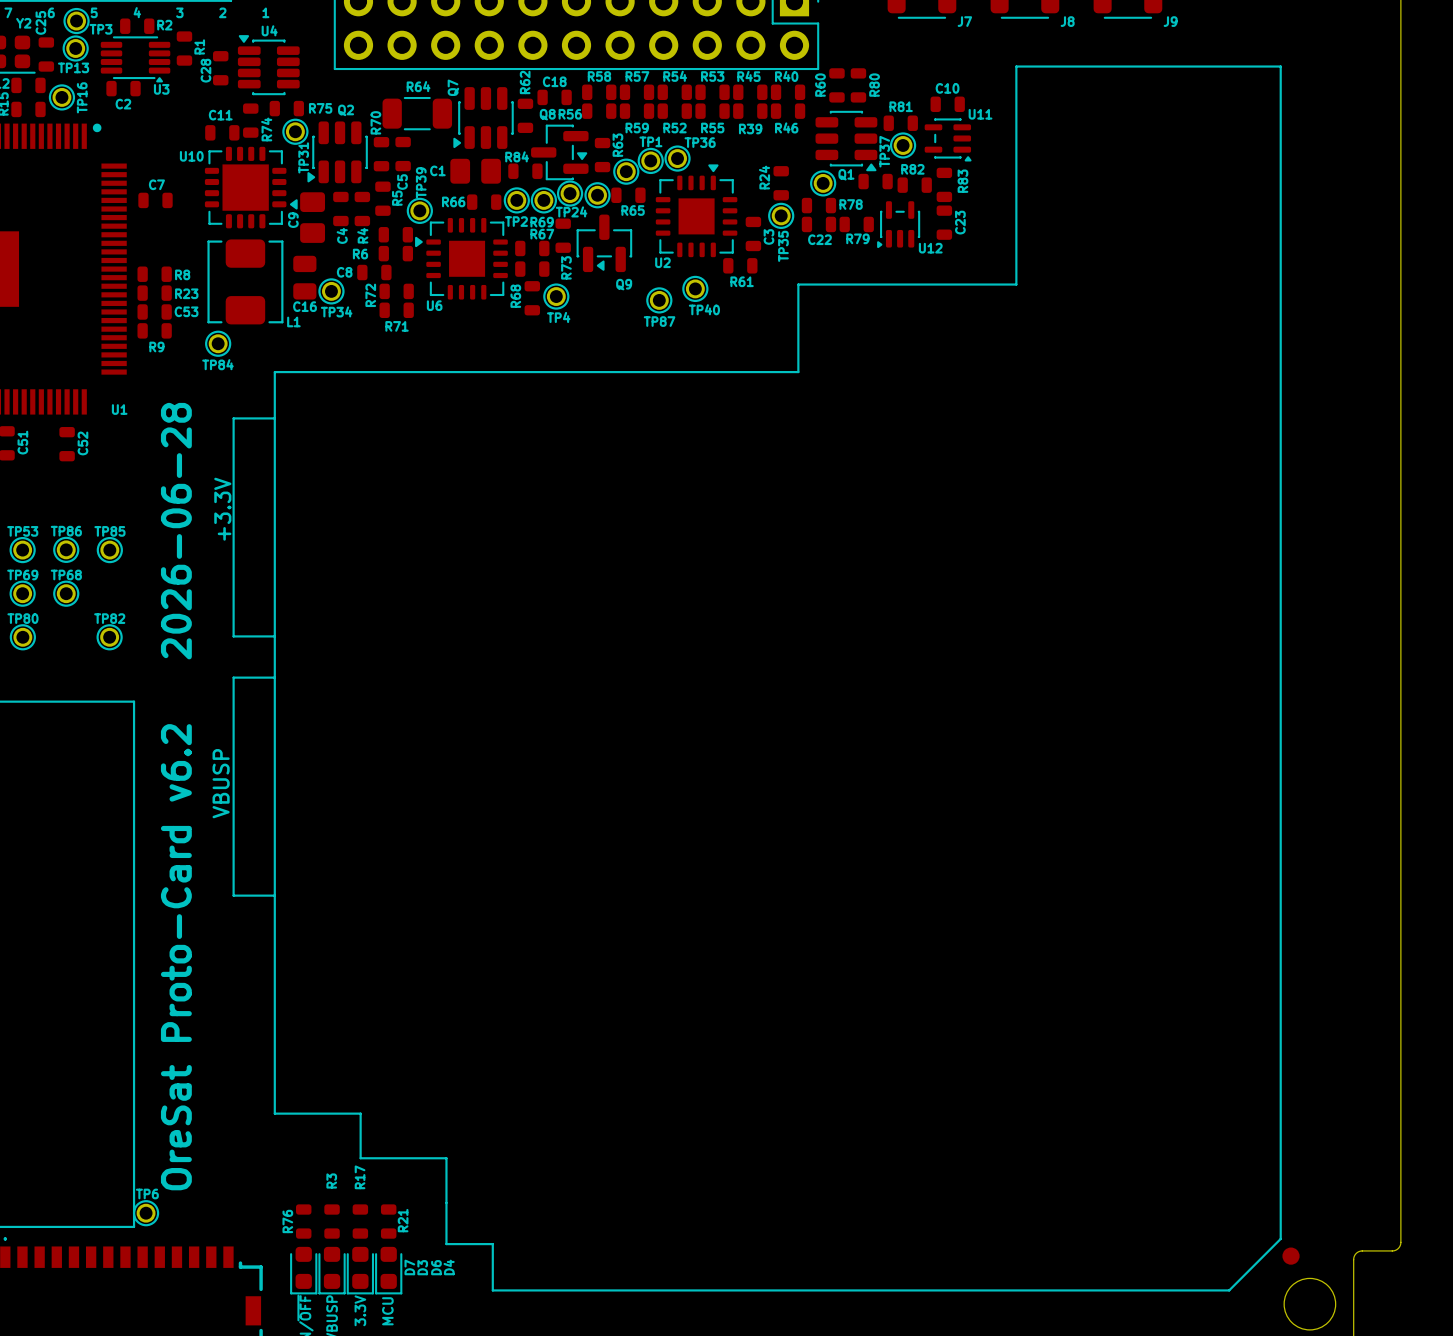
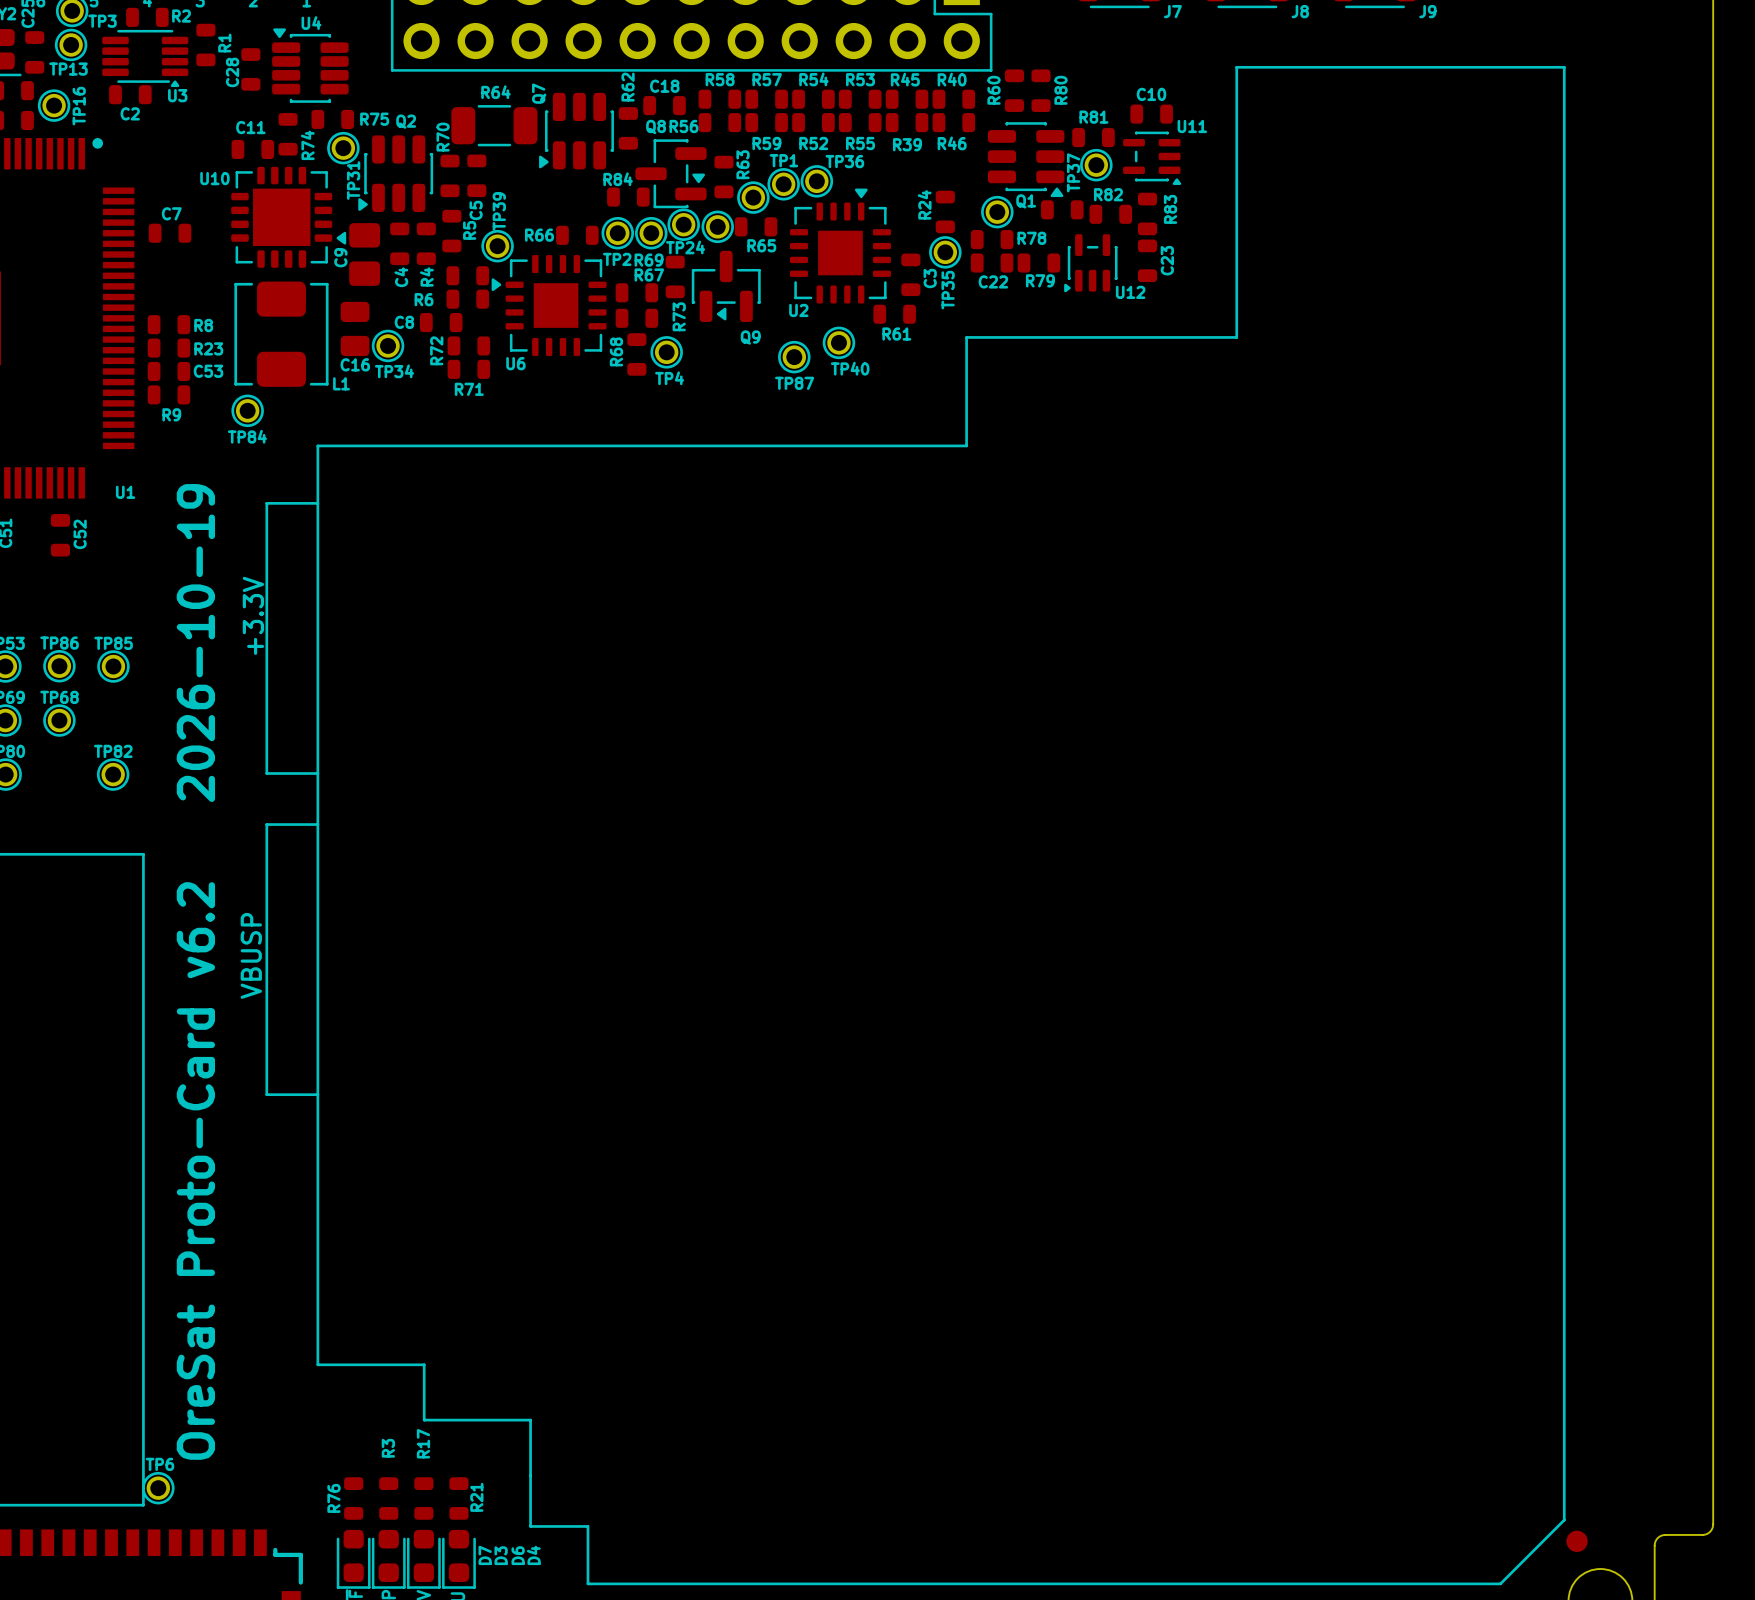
C1: (475, 171) -> none
text: 2026-06-28 (176, 531) -> 2026-10-19 (195, 643)

